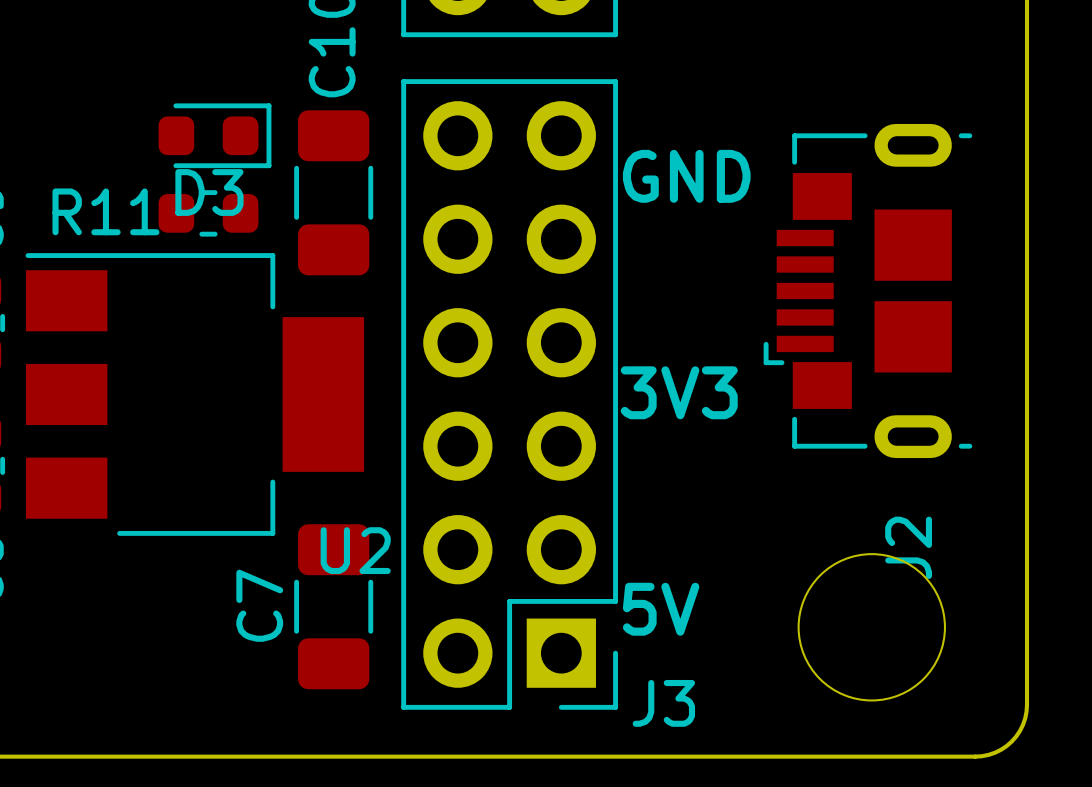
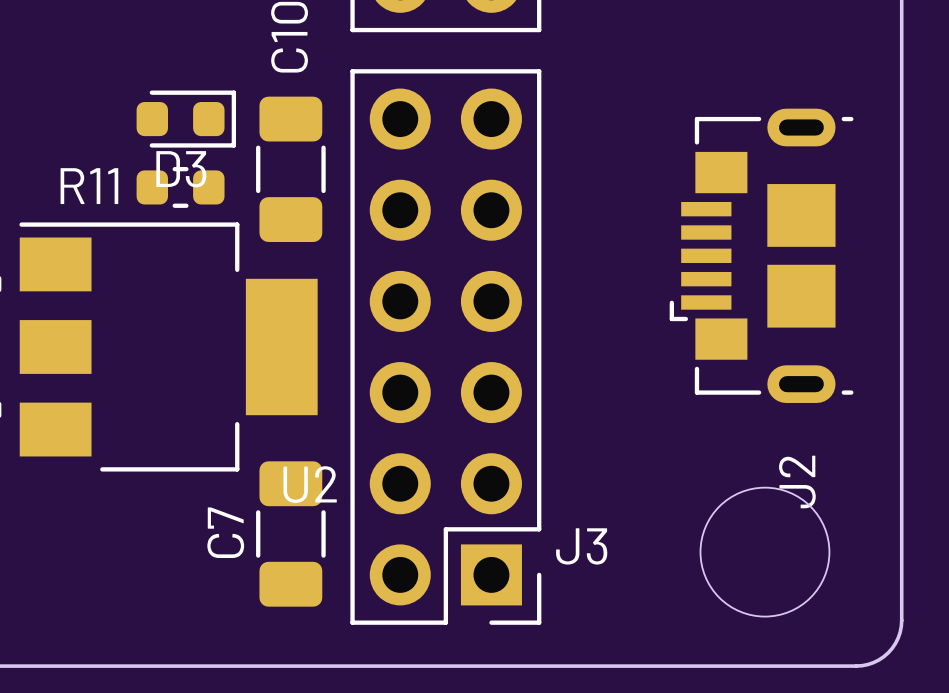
text: GND (686, 176) -> none
text: 3V3 (679, 392) -> none
text: 5V (661, 609) -> none
J3 name position: J3 (663, 703) -> J3 (581, 546)

